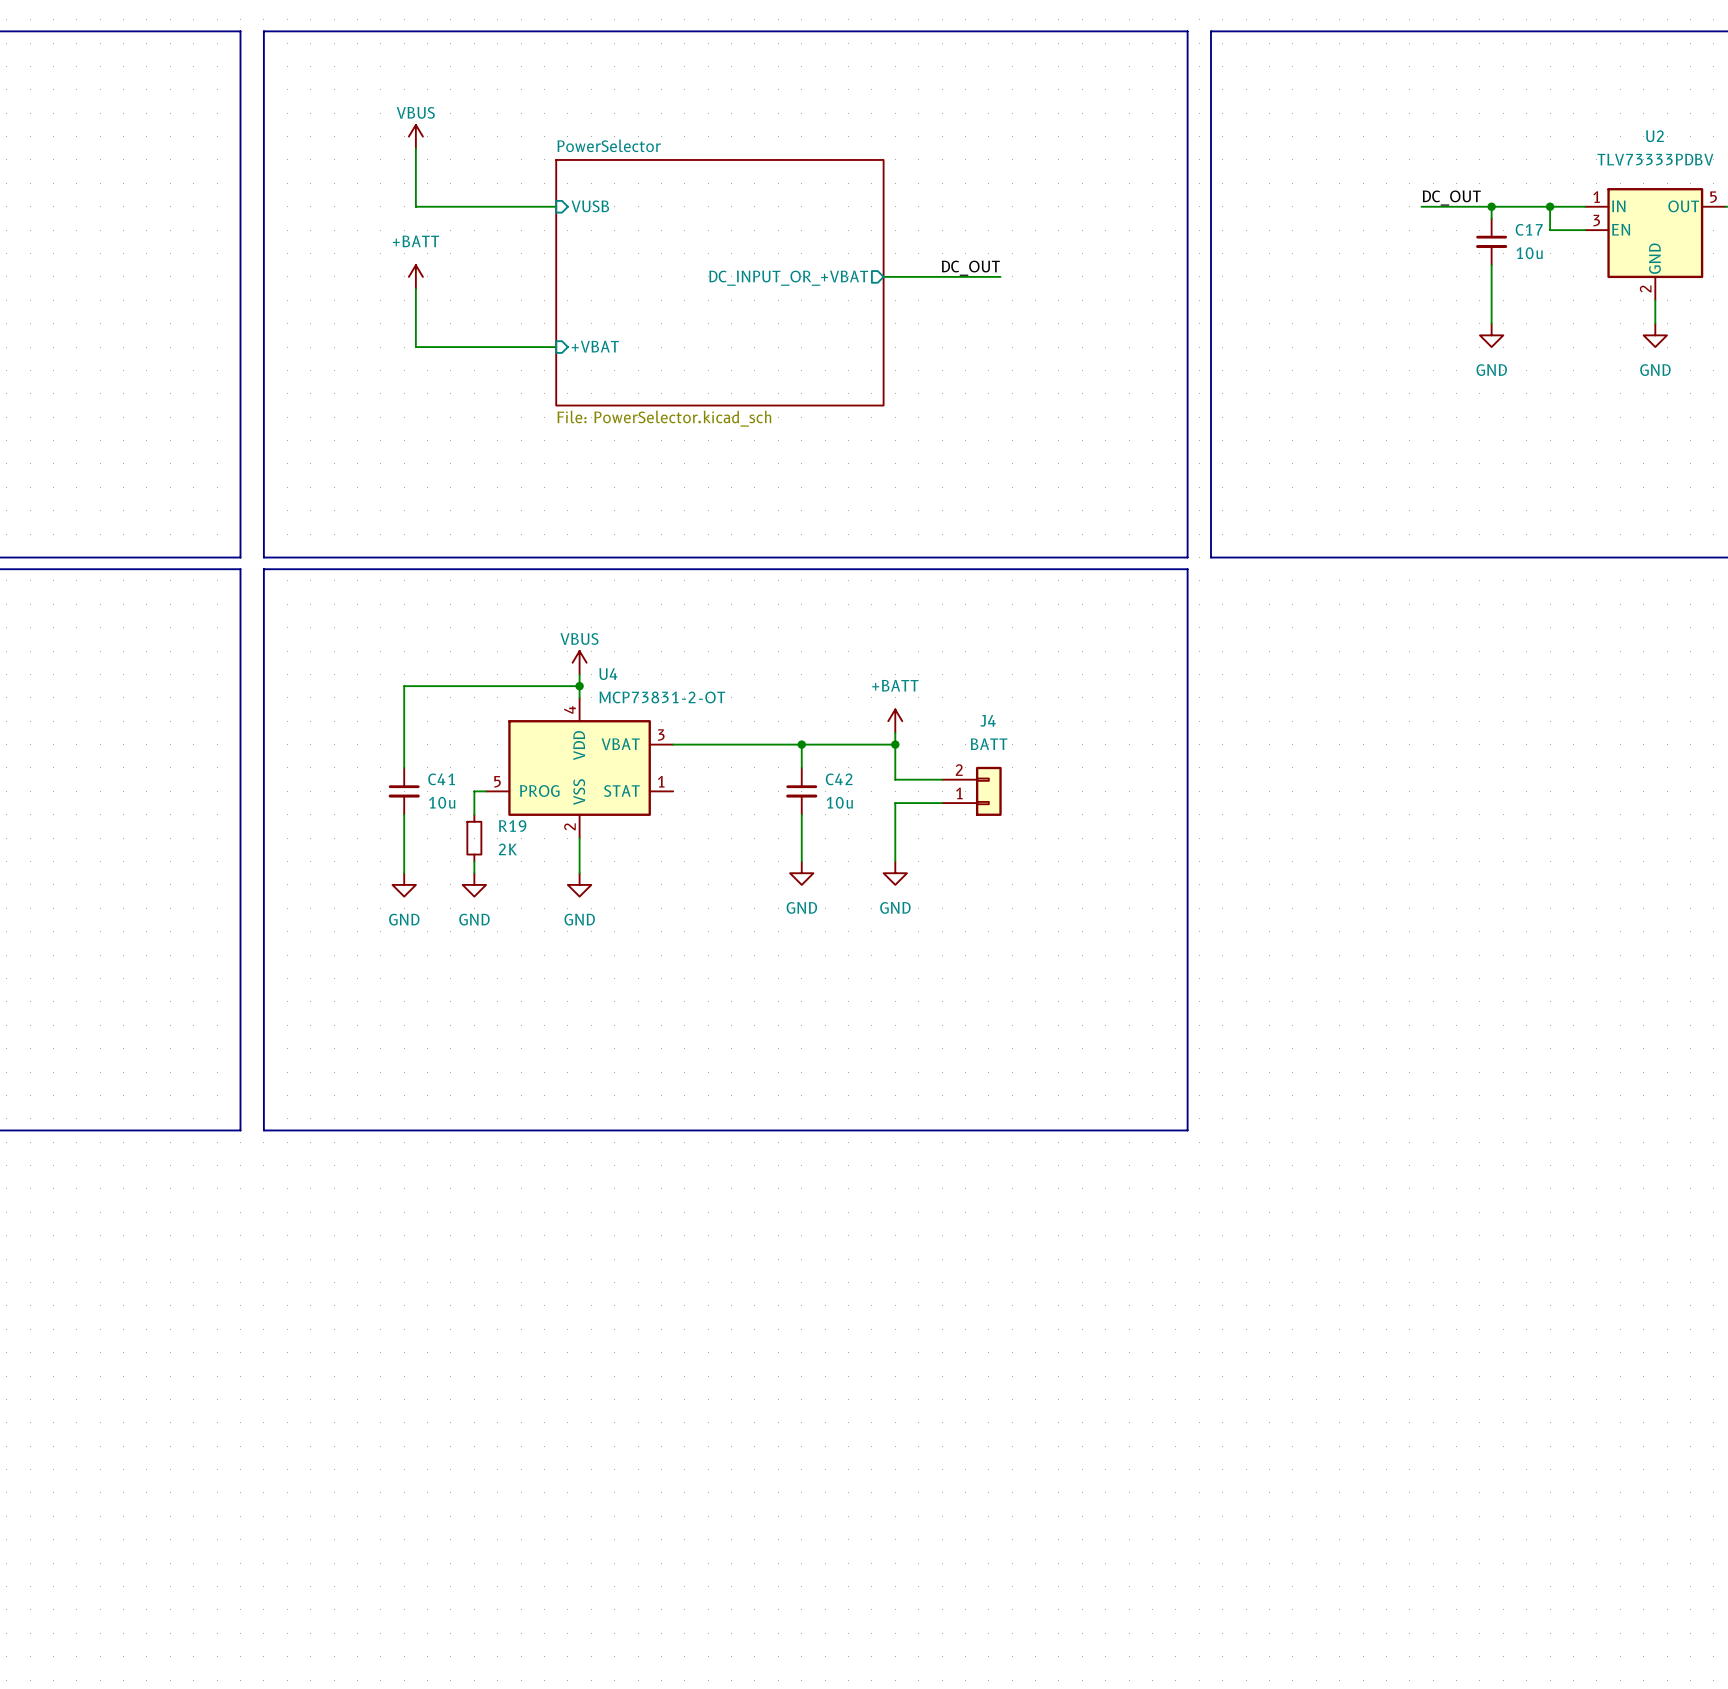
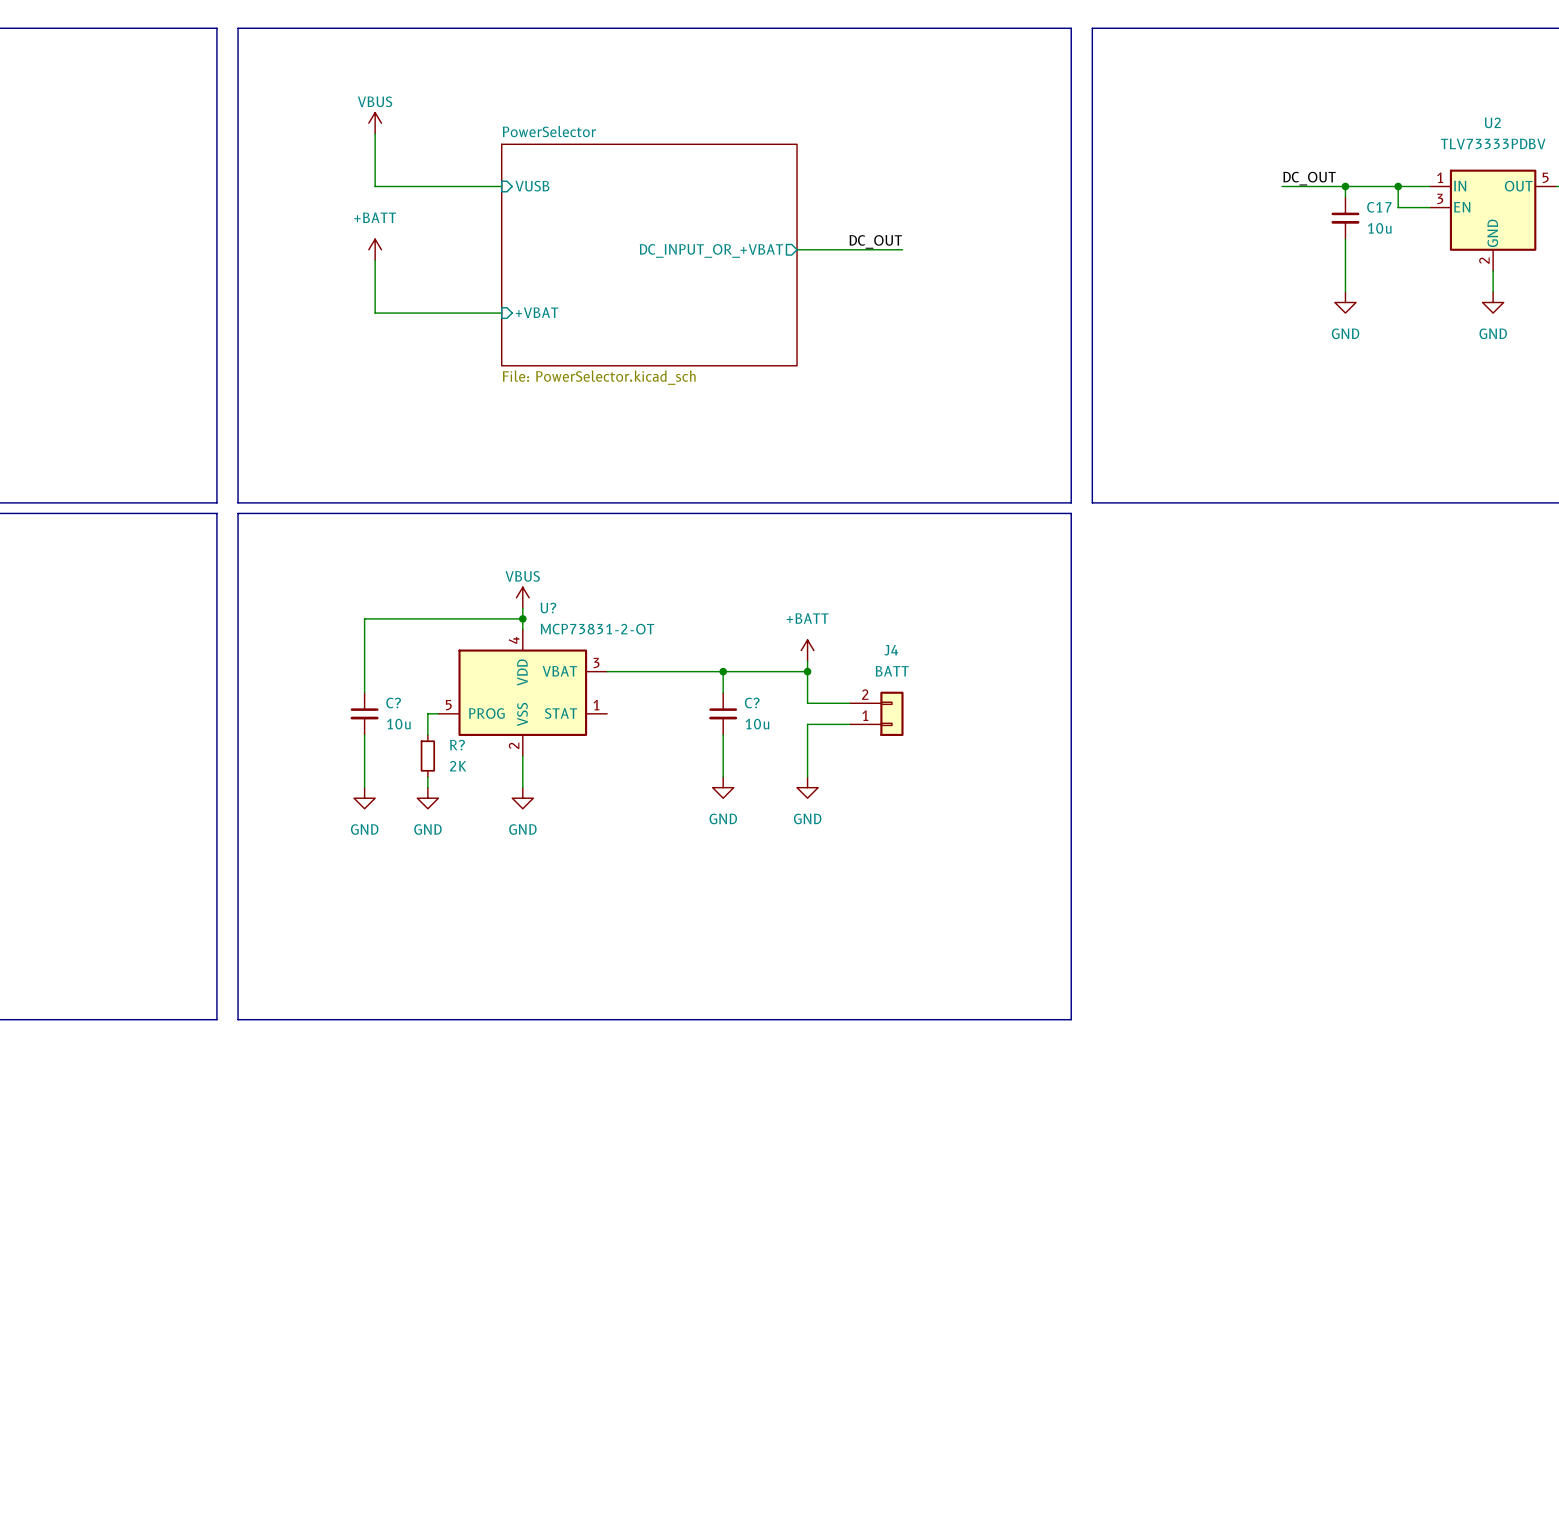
U4 name: U4 (608, 674) -> U? (548, 608)
C41 name: C41 (441, 779) -> C? (393, 703)
C42 name: C42 (839, 779) -> C? (752, 703)
R19 name: R19 (512, 826) -> R? (457, 745)

